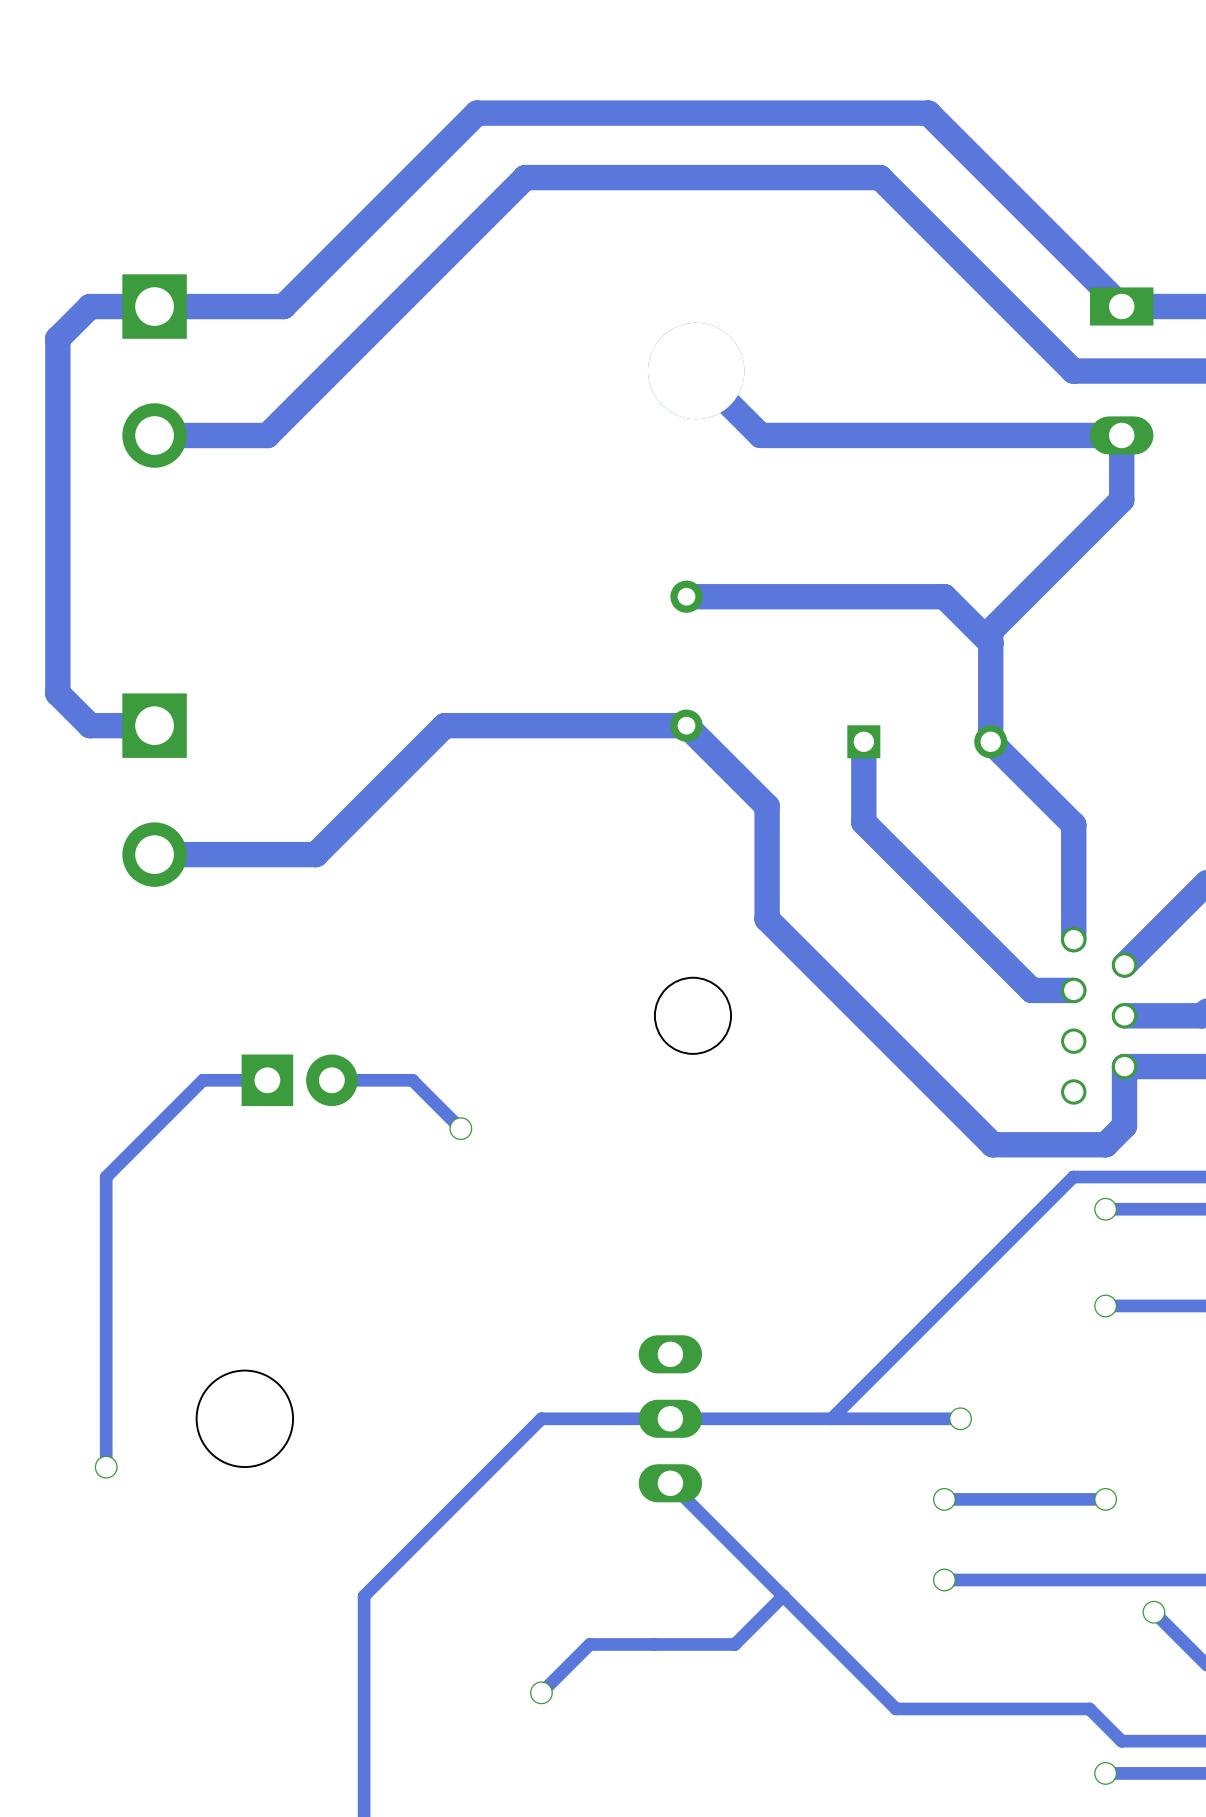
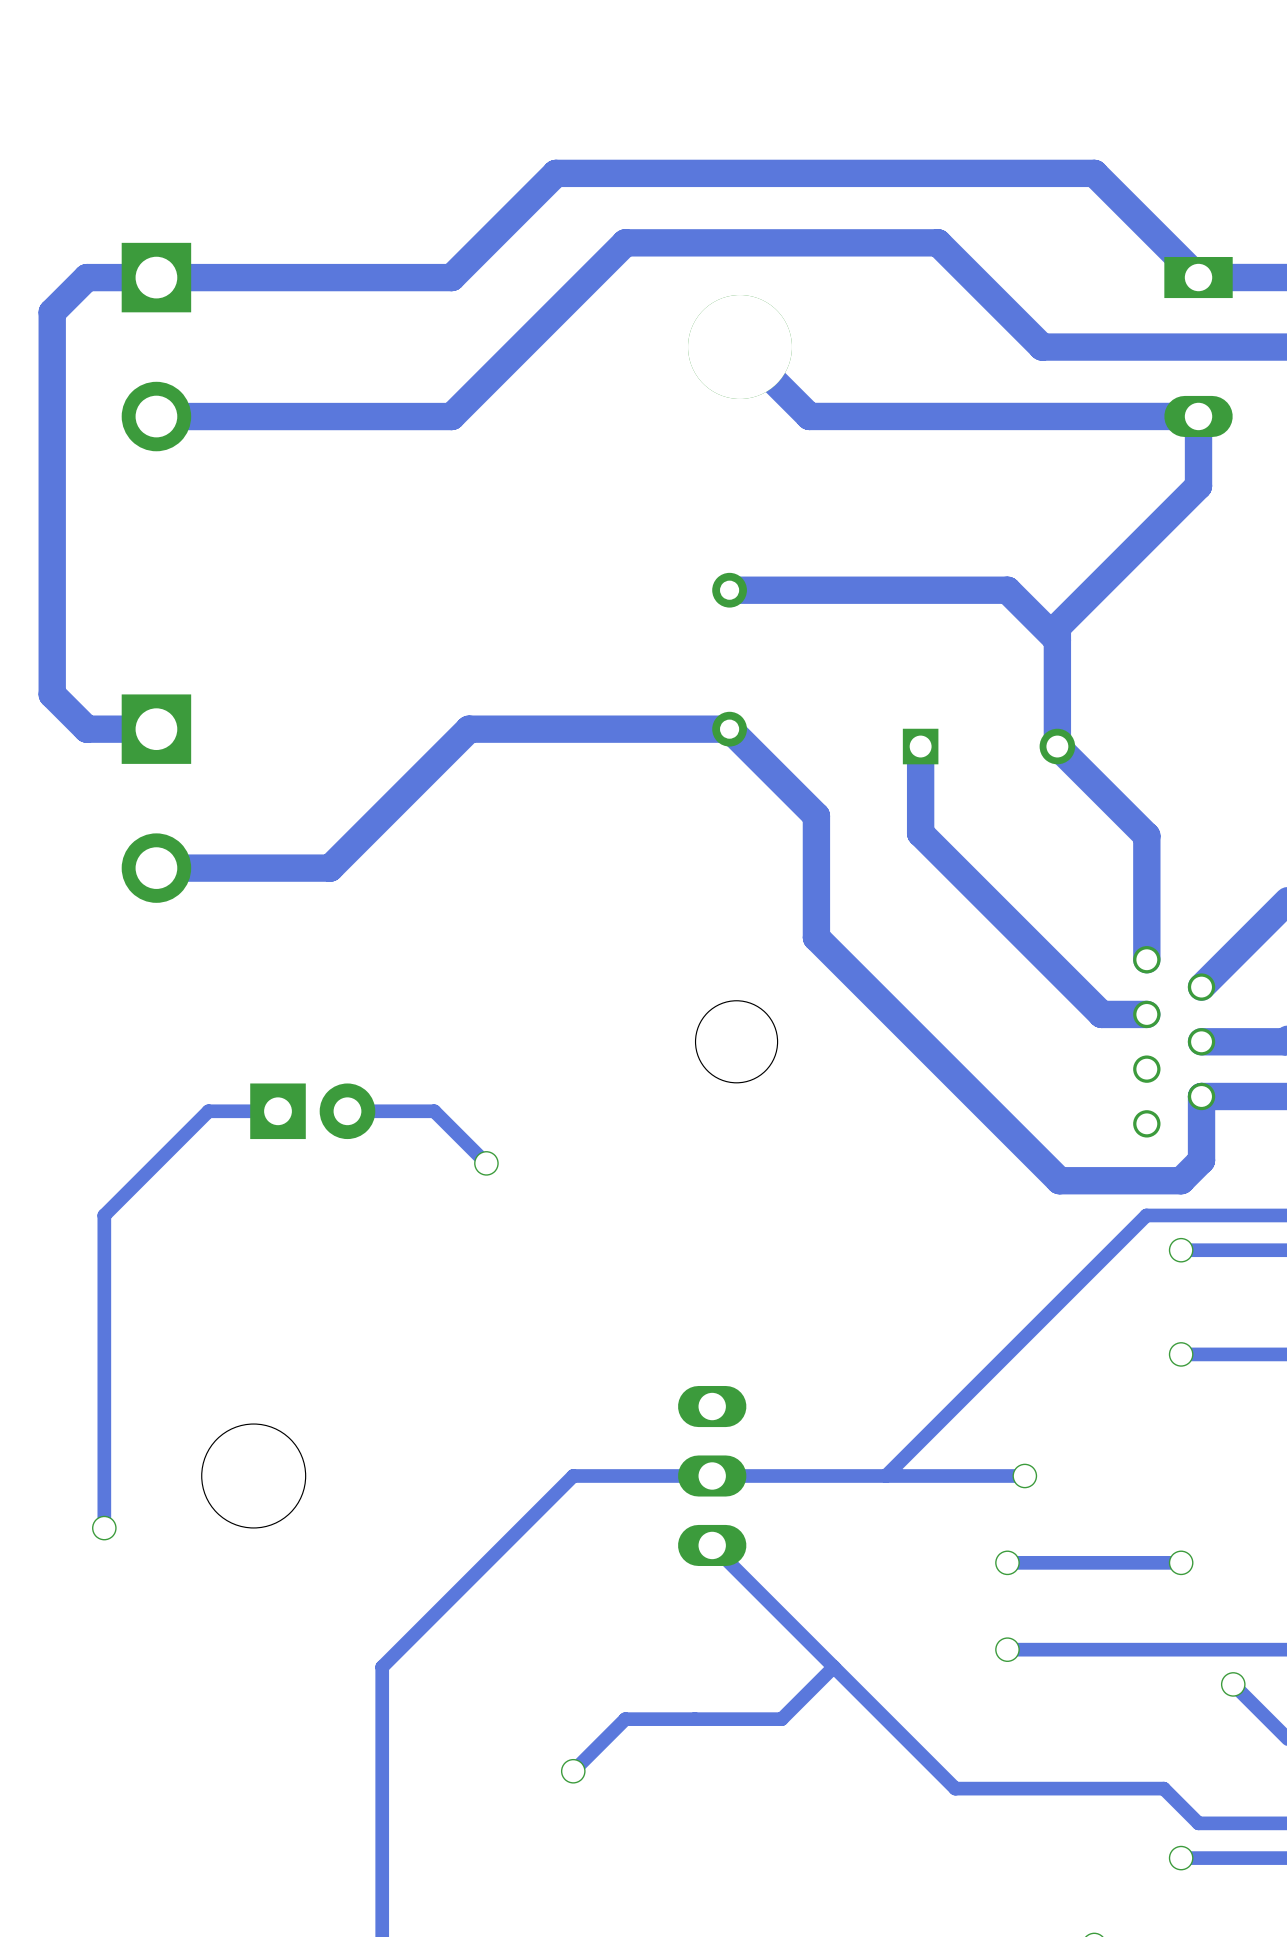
track: (1025, 209) (928, 113) (476, 113) (283, 306) -> (1094, 173) (555, 173) (451, 277) (295, 277)
track: (1073, 371) (879, 177) (525, 177) (267, 435) -> (1146, 347) (1042, 347) (938, 242) (625, 242) (451, 416) (278, 416)

